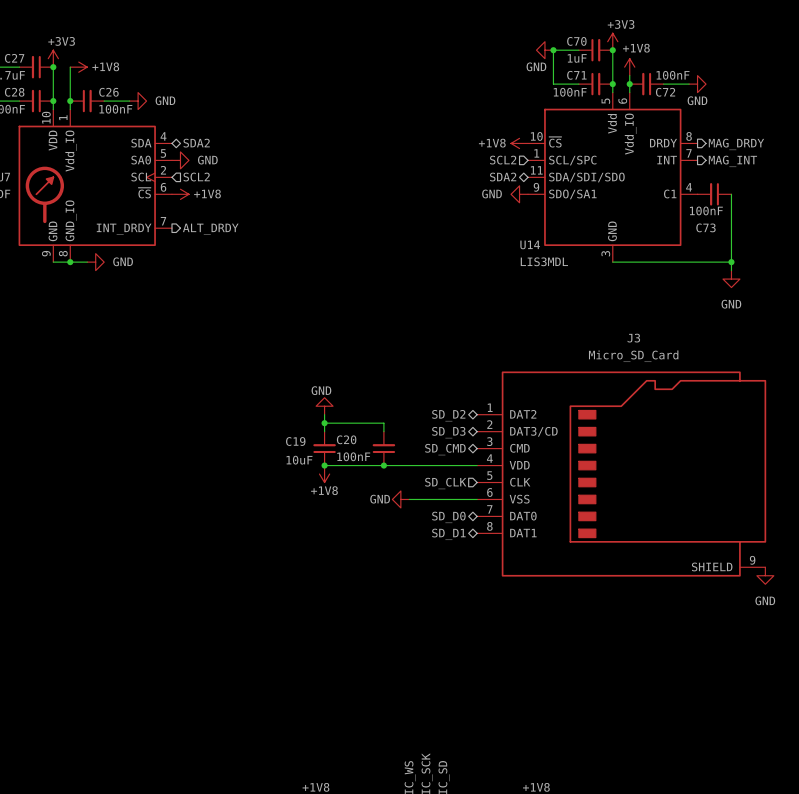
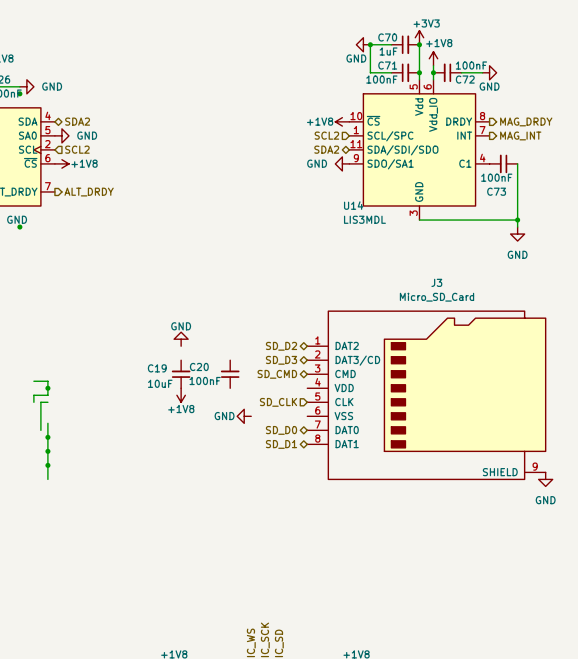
junction: none -> (19, 93)
junction: none -> (19, 227)
wire: (324, 414) (324, 431) -> none
wire: (324, 423) (383, 423) (383, 431) -> none
junction: (324, 423) -> none
wire: none -> (33, 381) (47, 381) (47, 395) (33, 395) (33, 402)
junction: none -> (47, 388)
wire: (324, 465) (477, 465) -> none
junction: (324, 465) -> none
junction: (383, 465) -> none
wire: none -> (47, 402) (40, 402) (40, 430)
wire: (409, 499) (477, 499) -> none
wire: none -> (47, 423) (47, 479)
junction: none -> (47, 437)
junction: none -> (47, 451)
junction: none -> (47, 465)

